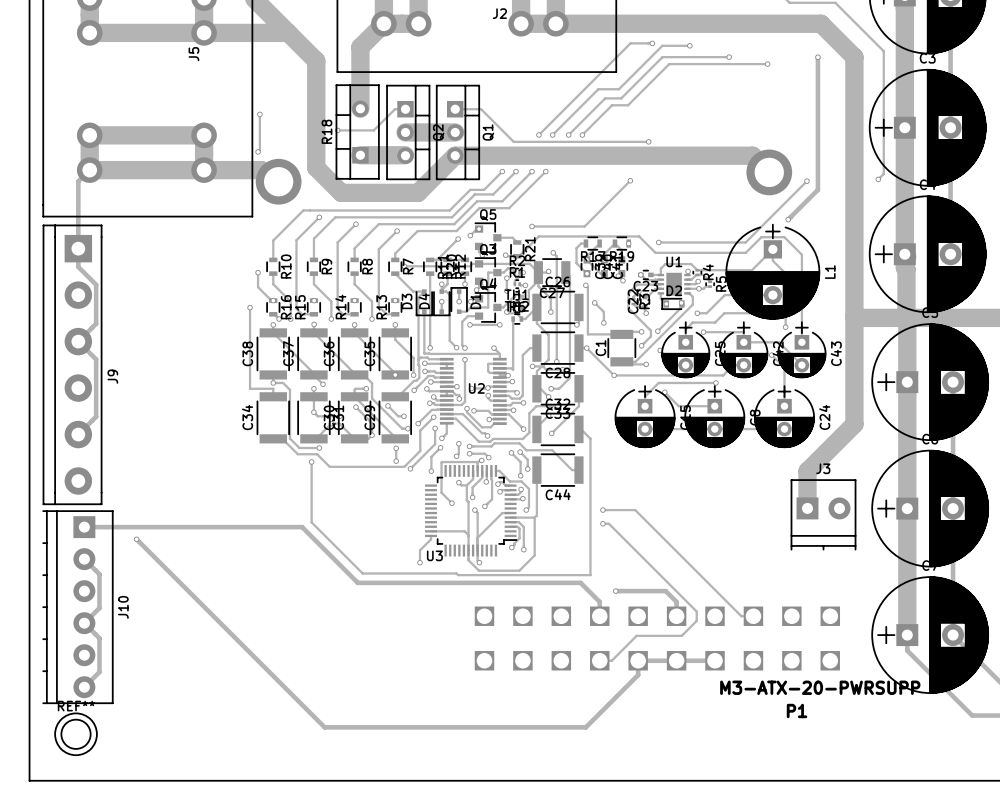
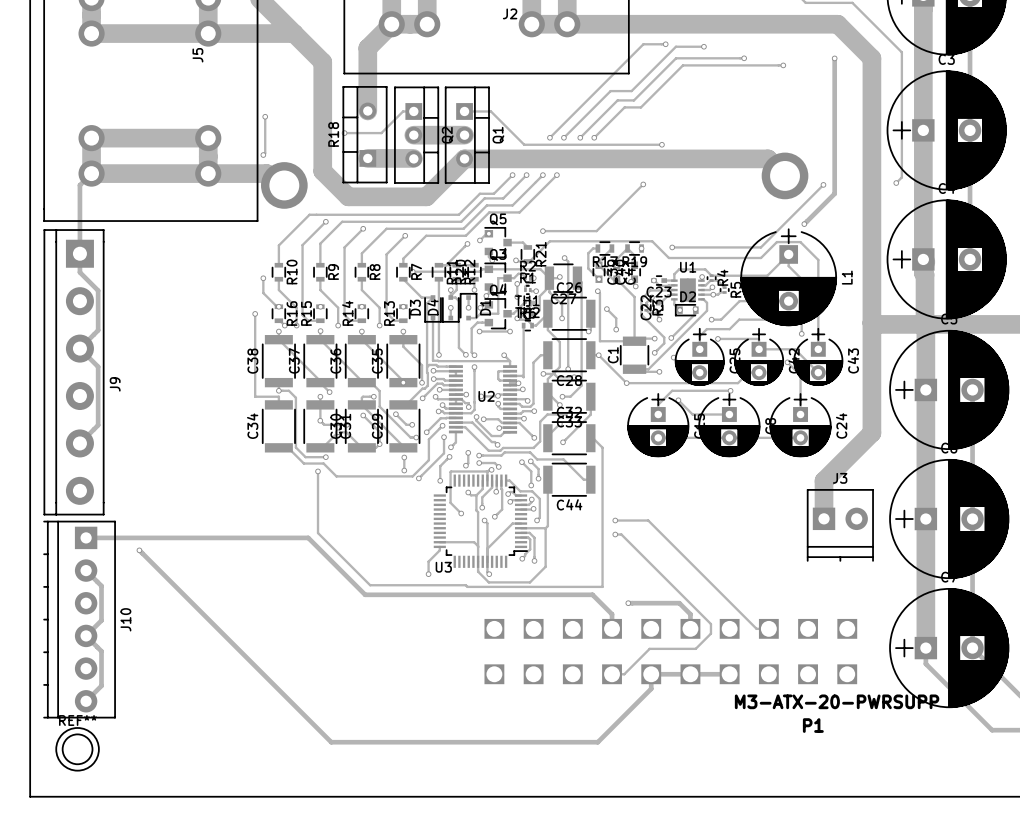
track: none -> (616, 279) (634, 297) (634, 341)

